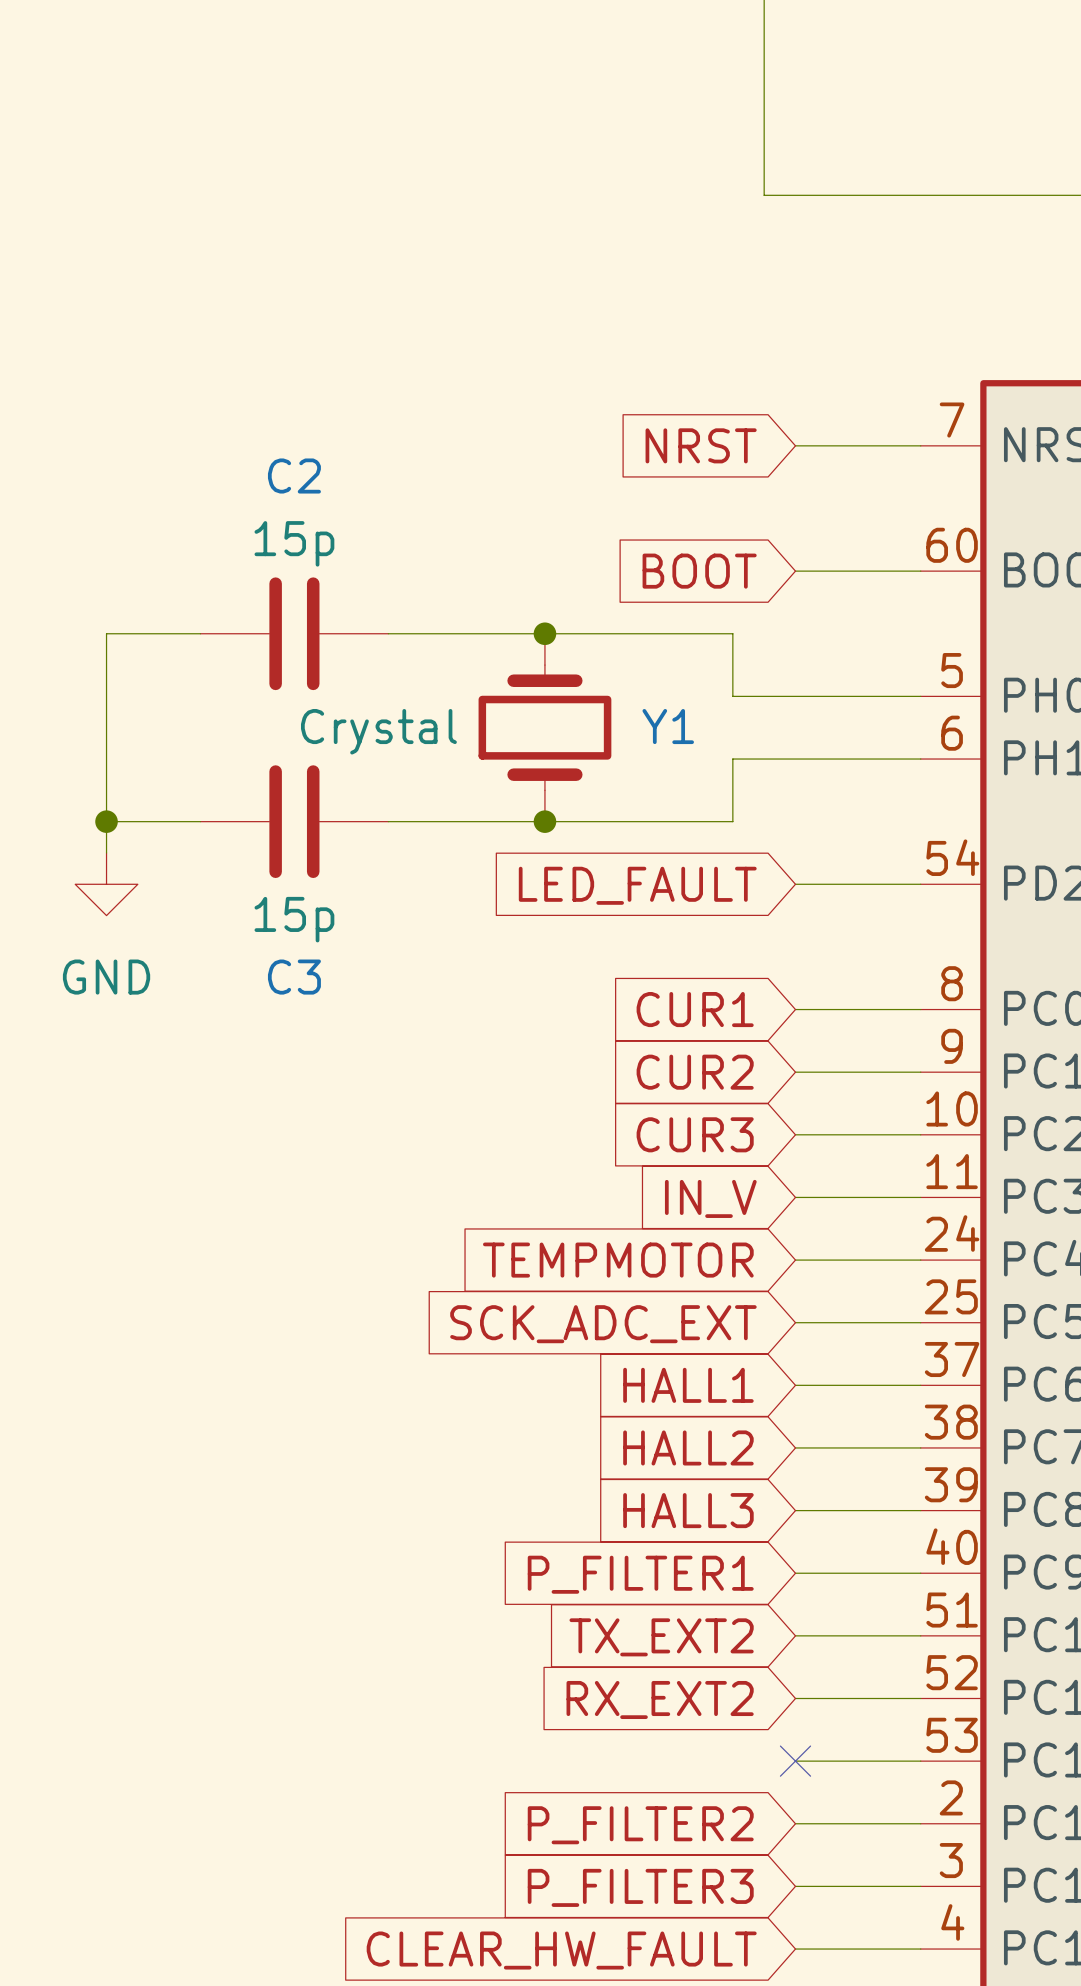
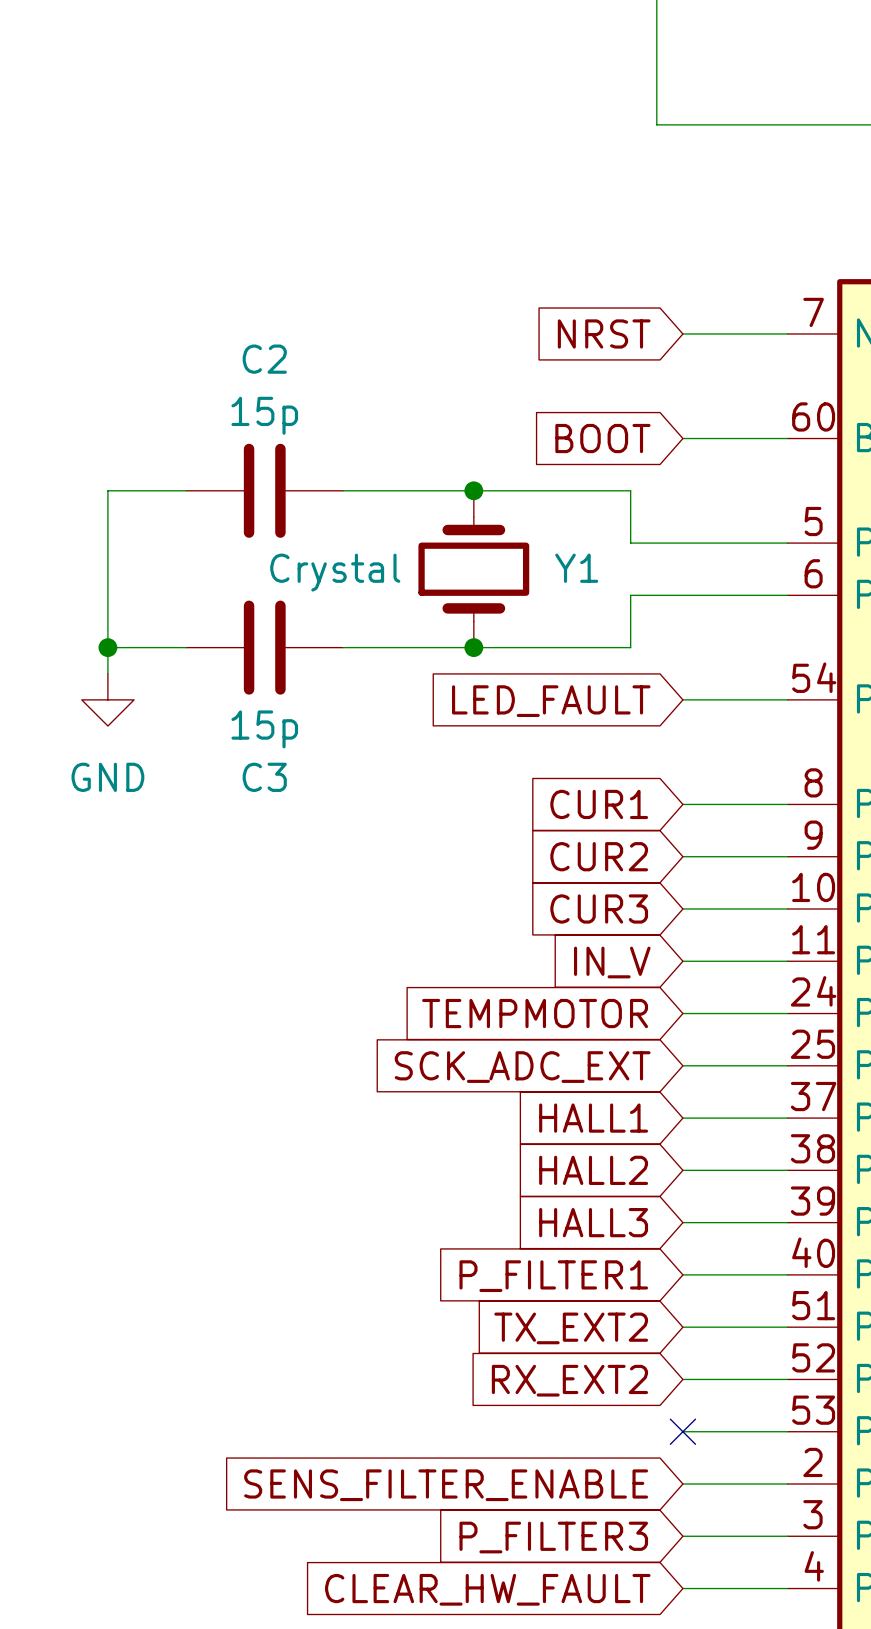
global label: P_FILTER2 (640, 1825) -> SENS_FILTER_ENABLE (446, 1485)

